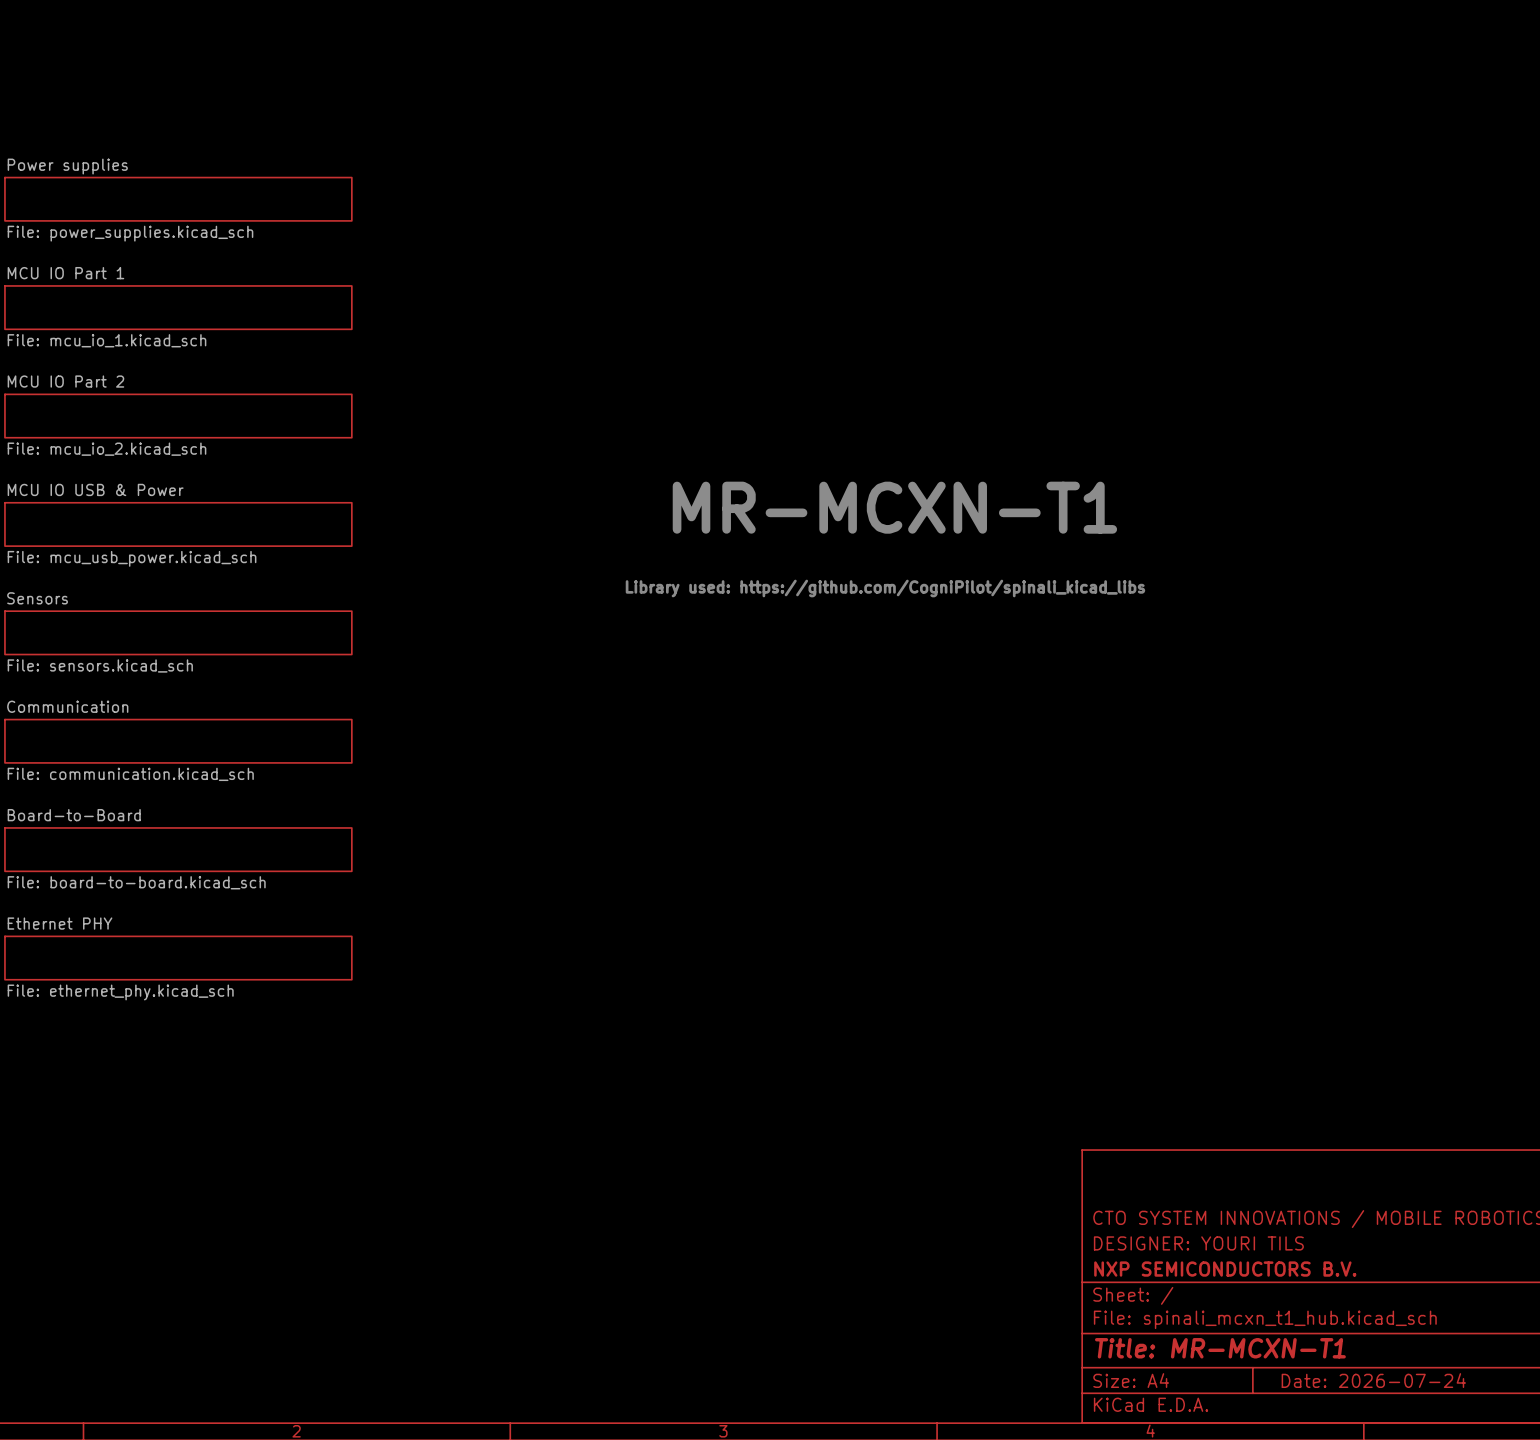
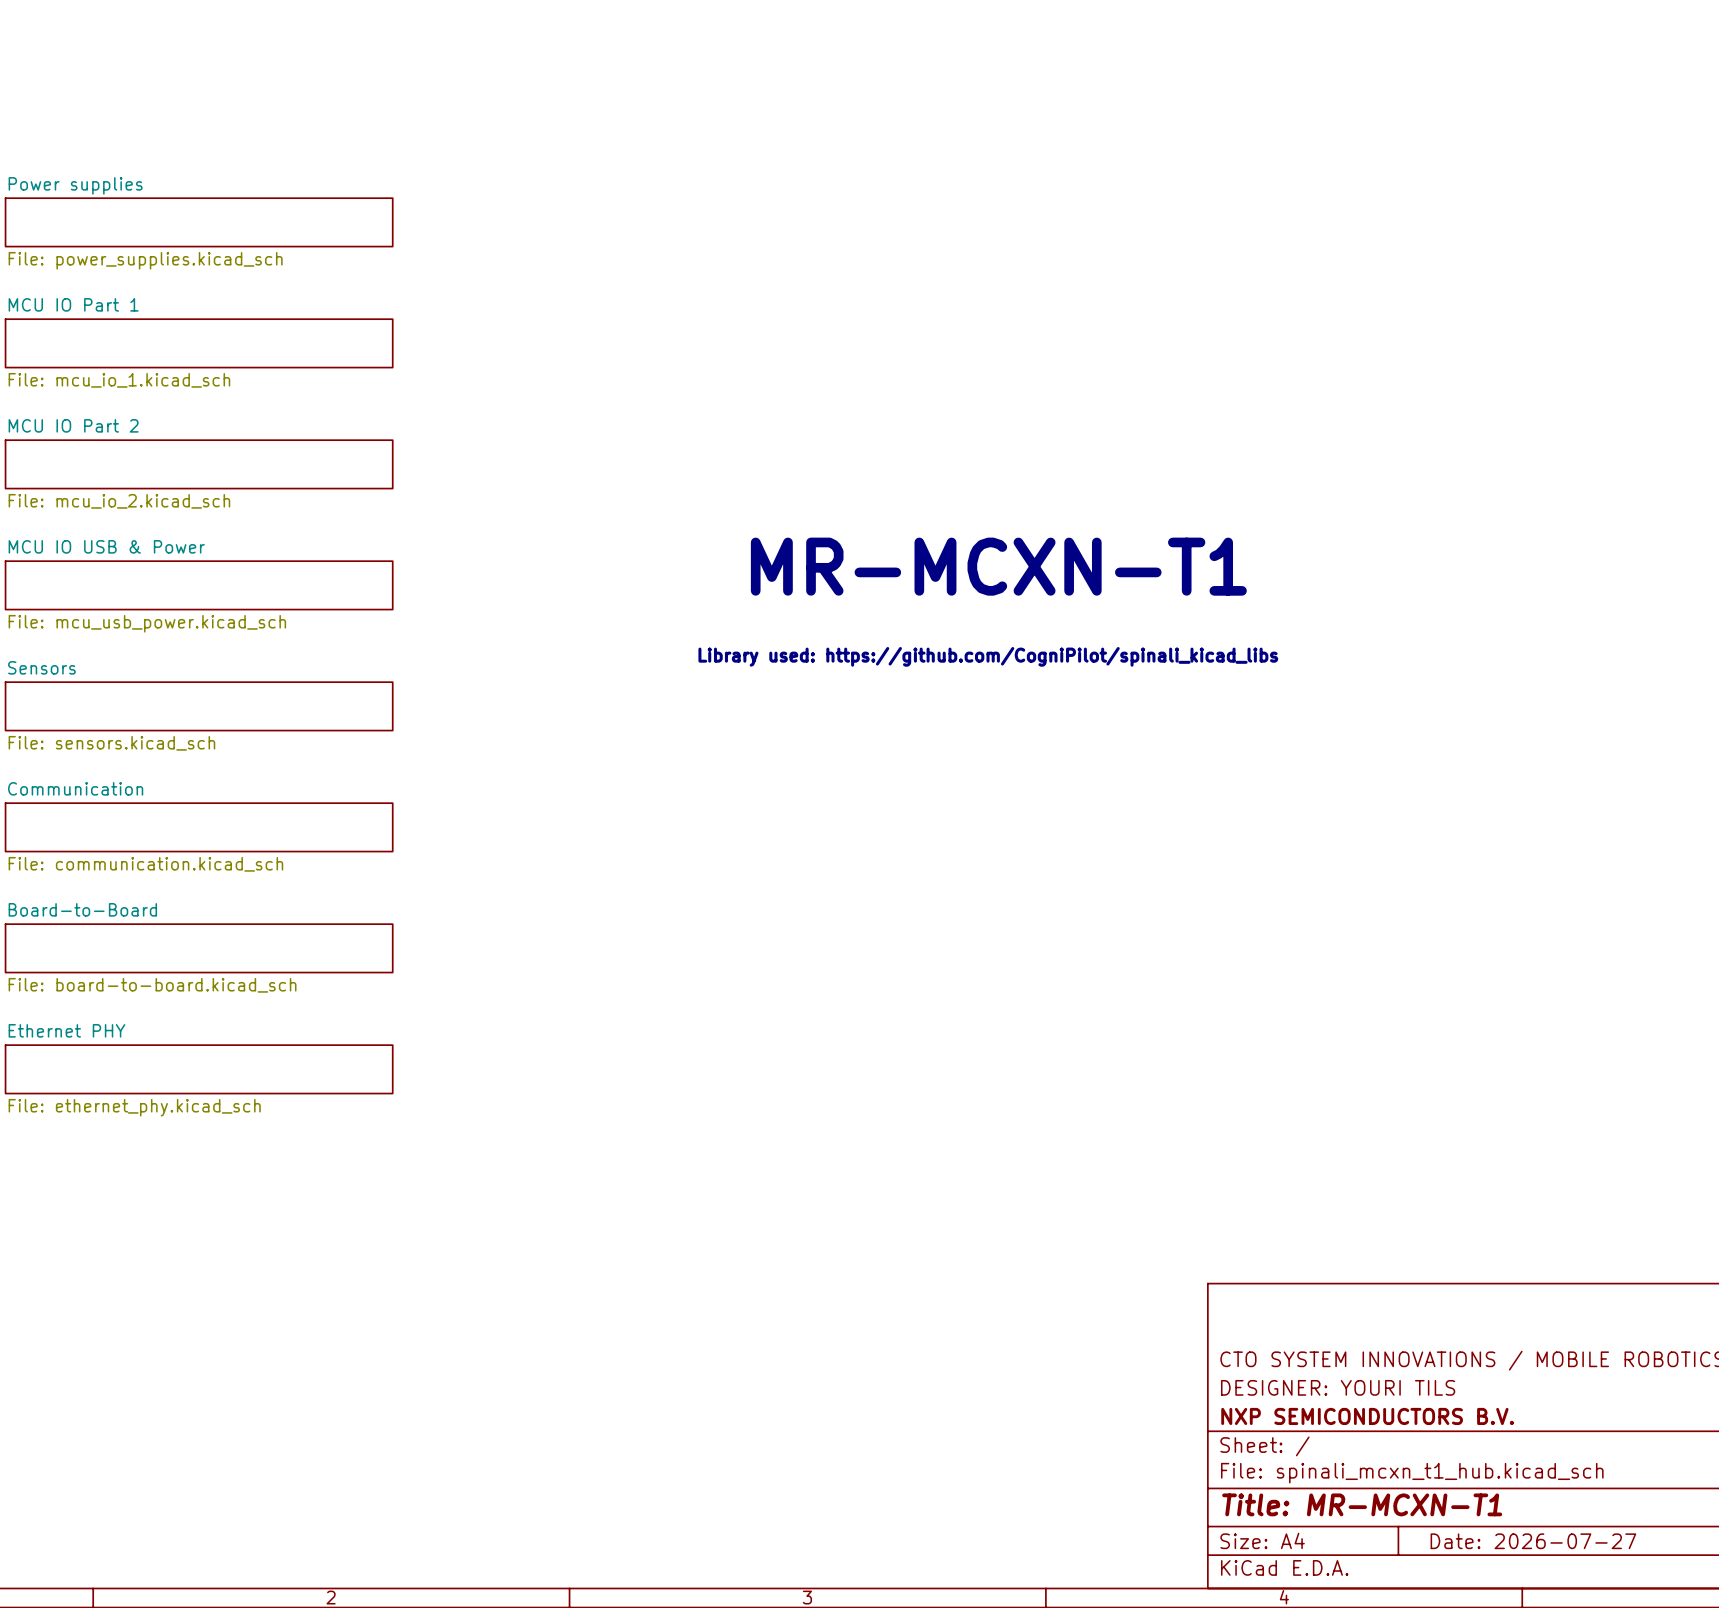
title block: Date: 2026-07-24 (1373, 1380) -> Date: 2026-07-27 (1533, 1541)

